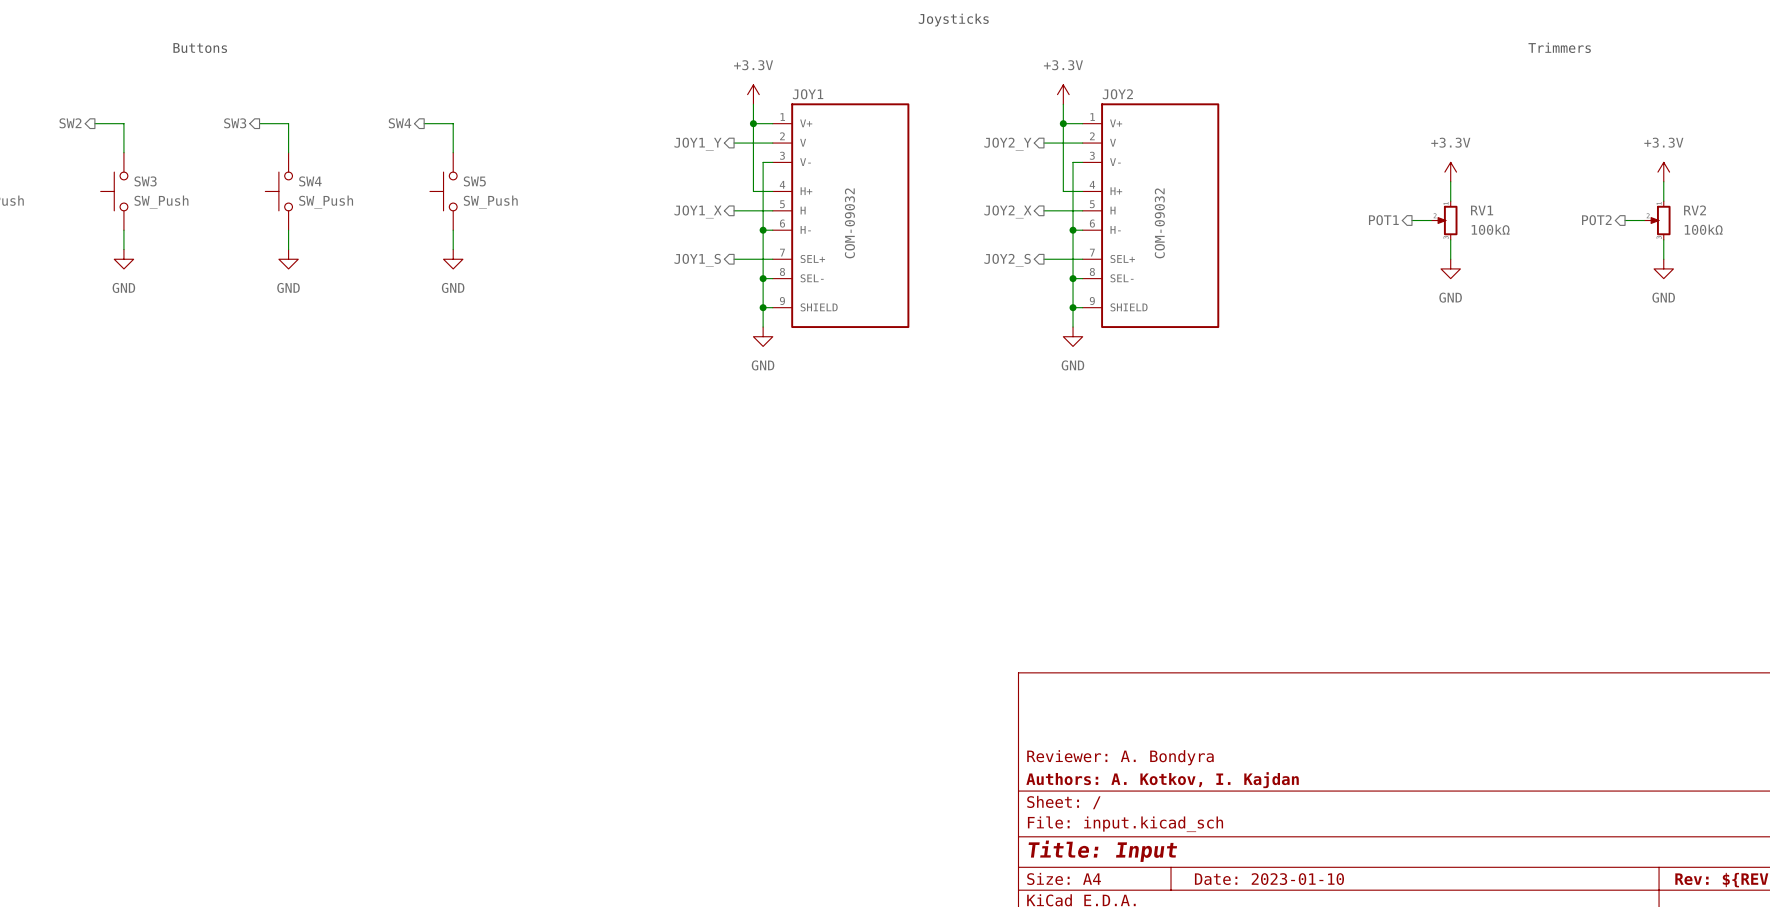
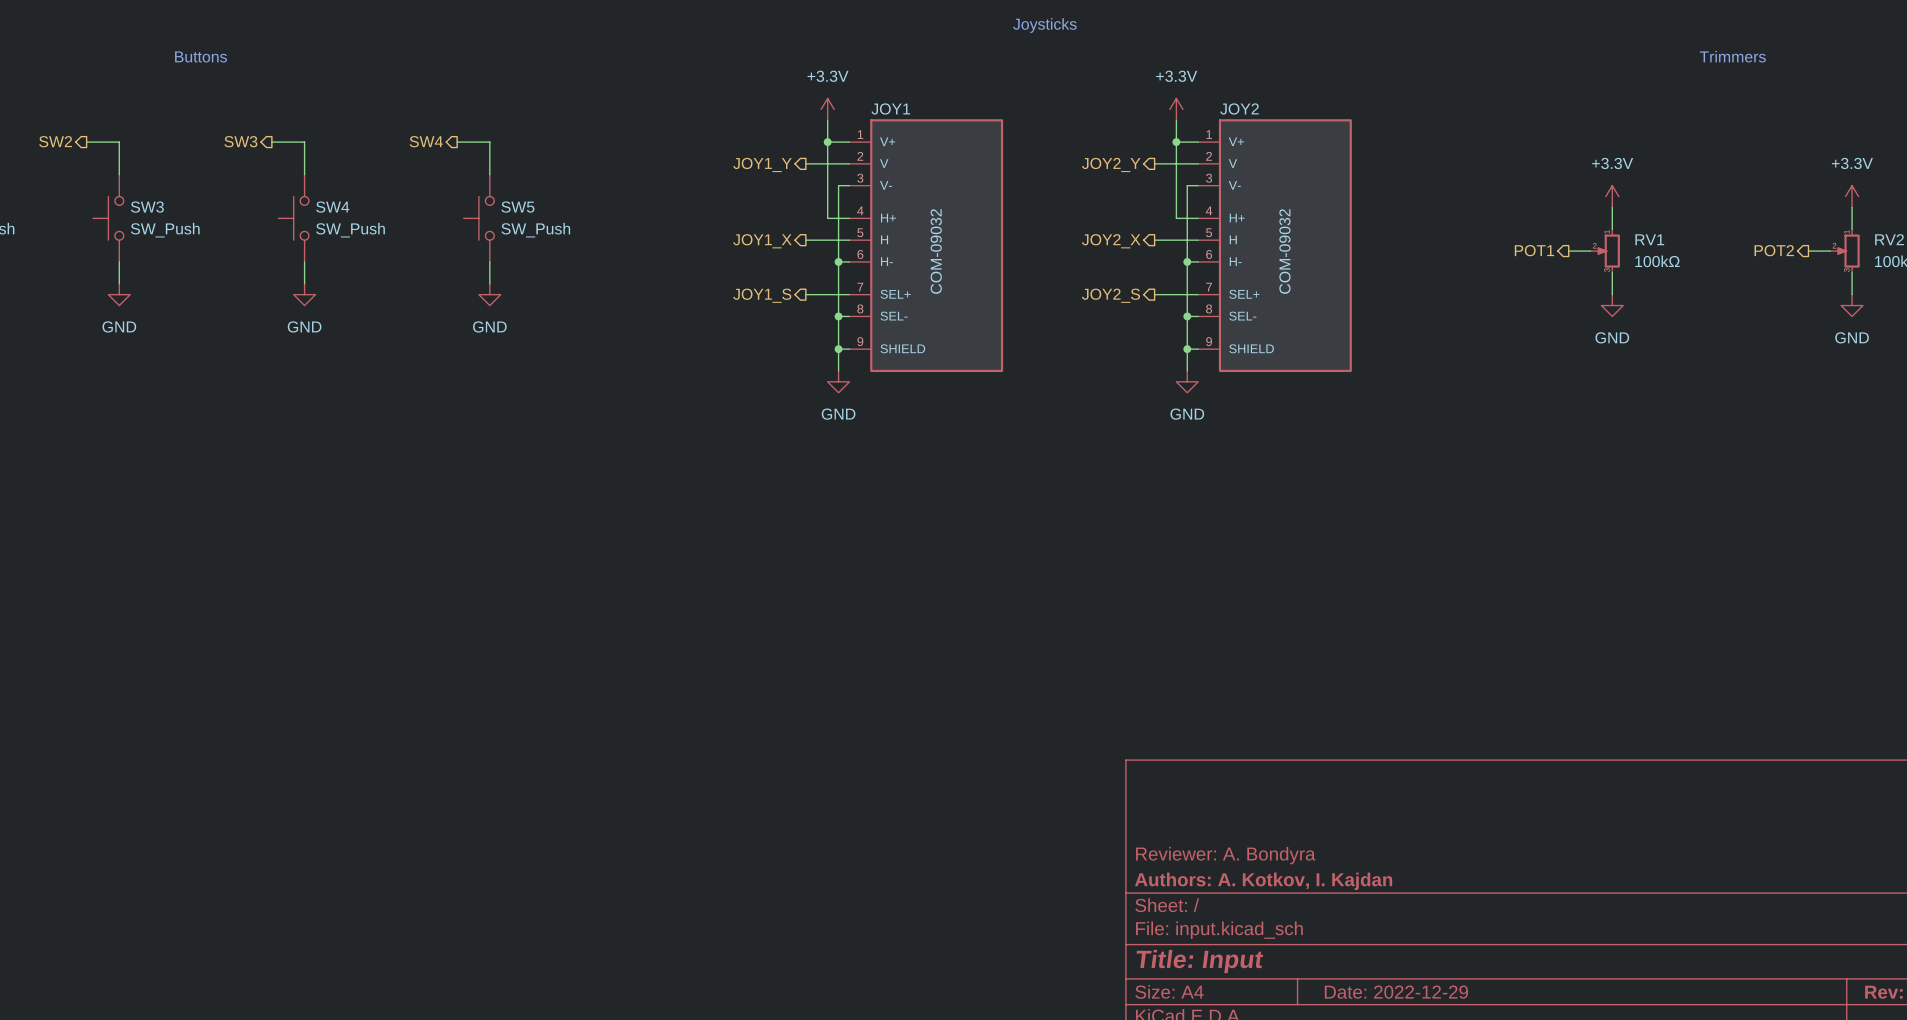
title block: Date: 2023-01-10 (1269, 879) -> Date: 2022-12-29 (1396, 992)

